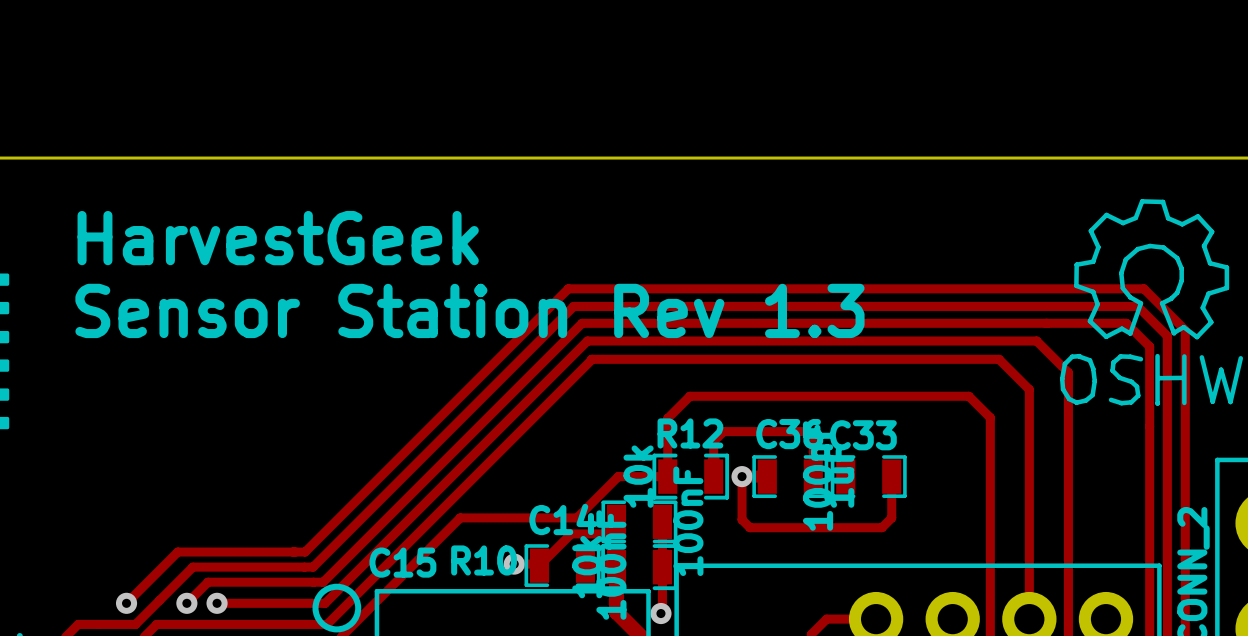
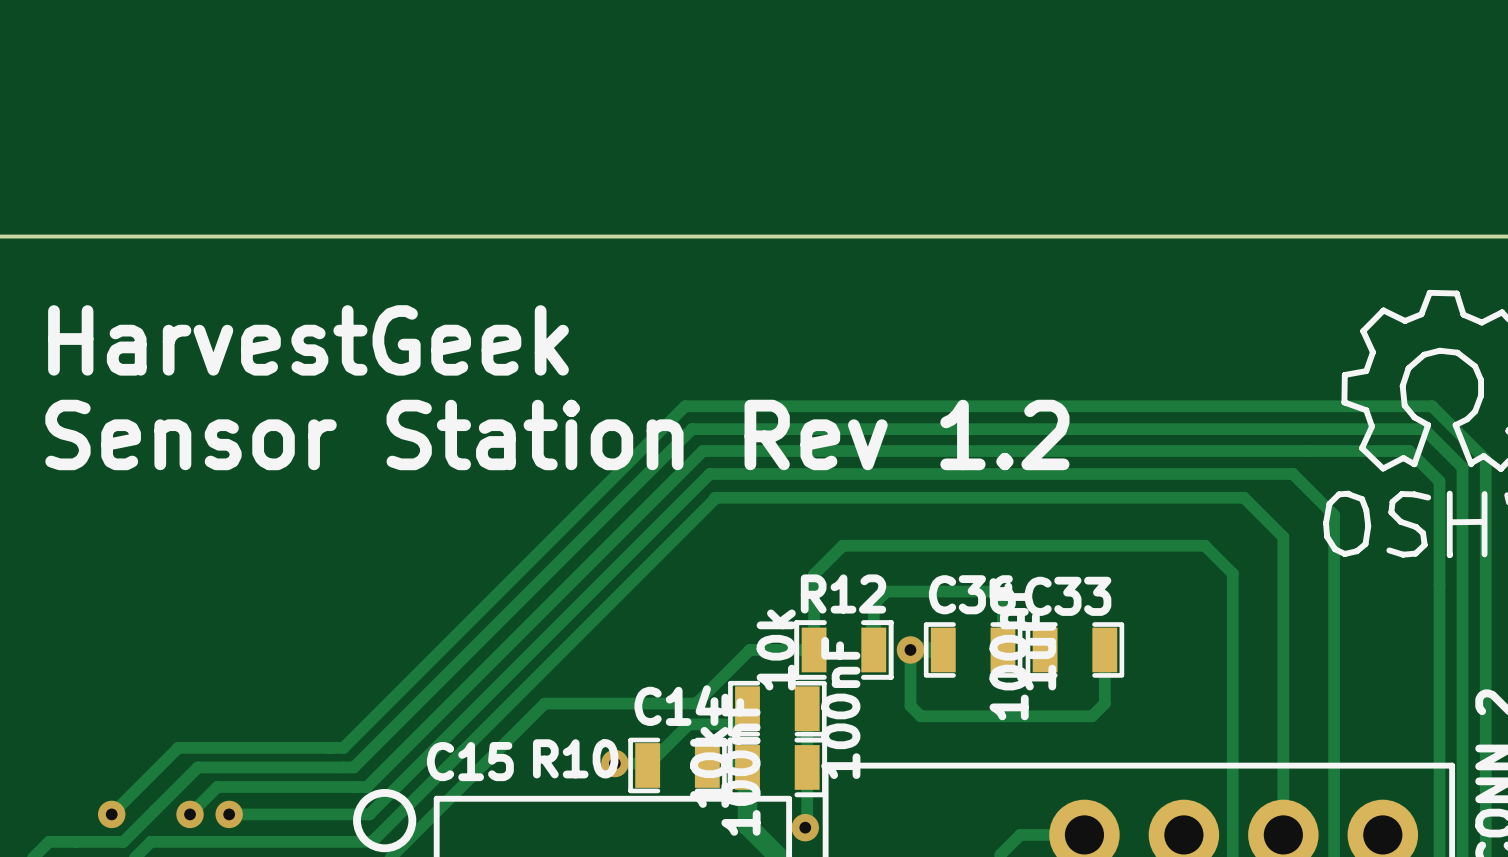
text: Sensor Station Rev 1.3 (469, 310) -> Sensor Station Rev 1.2 (557, 434)

